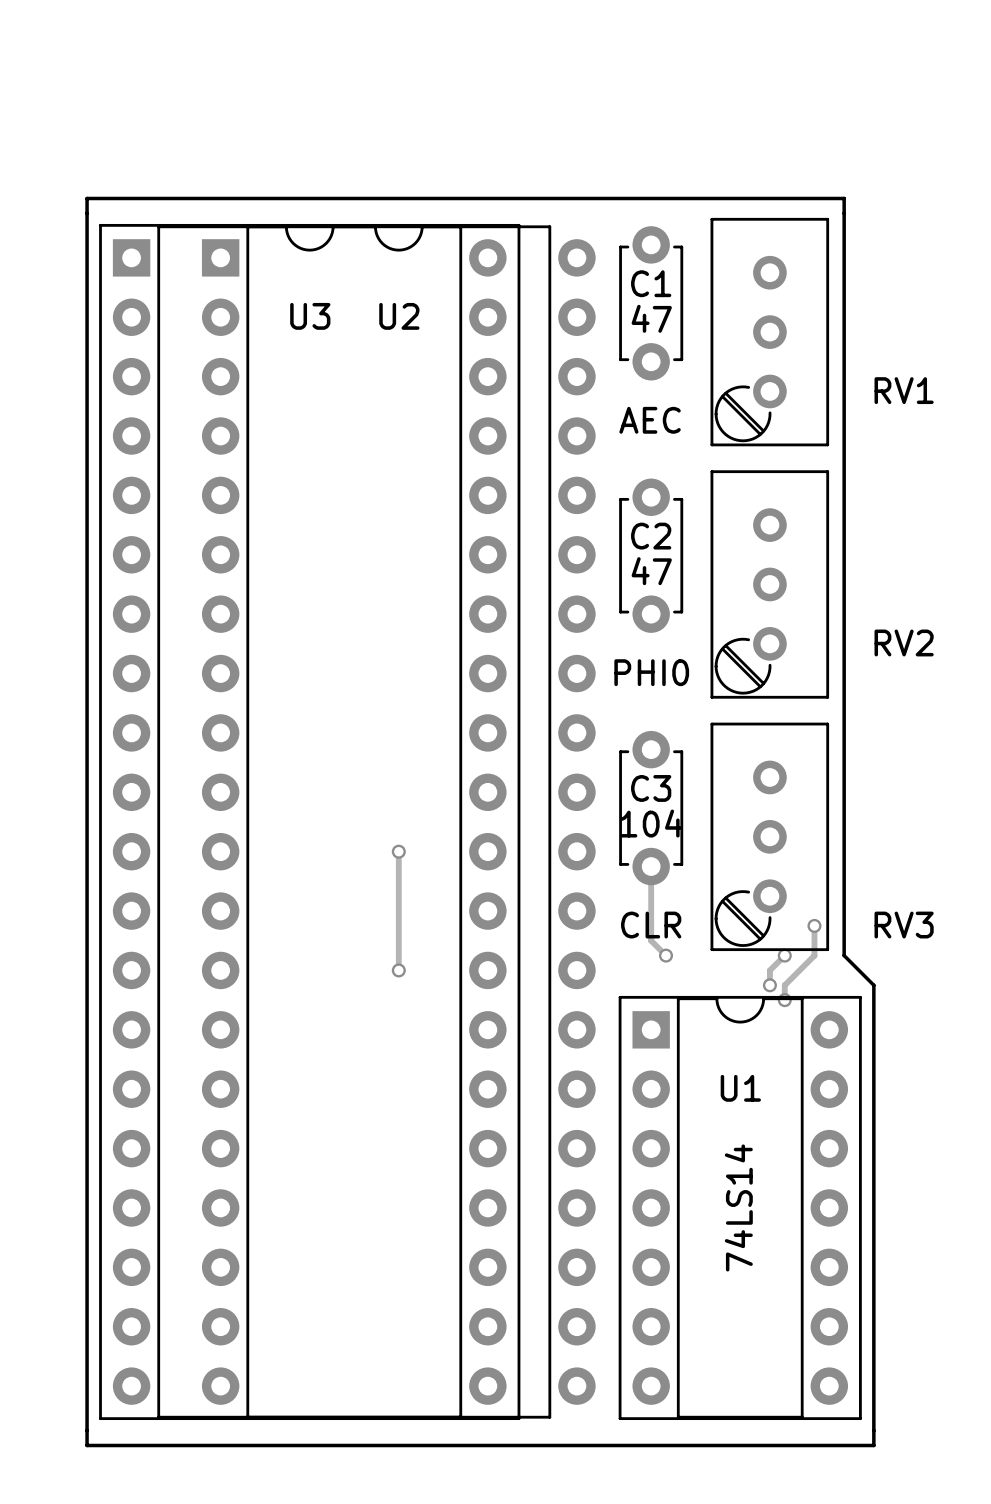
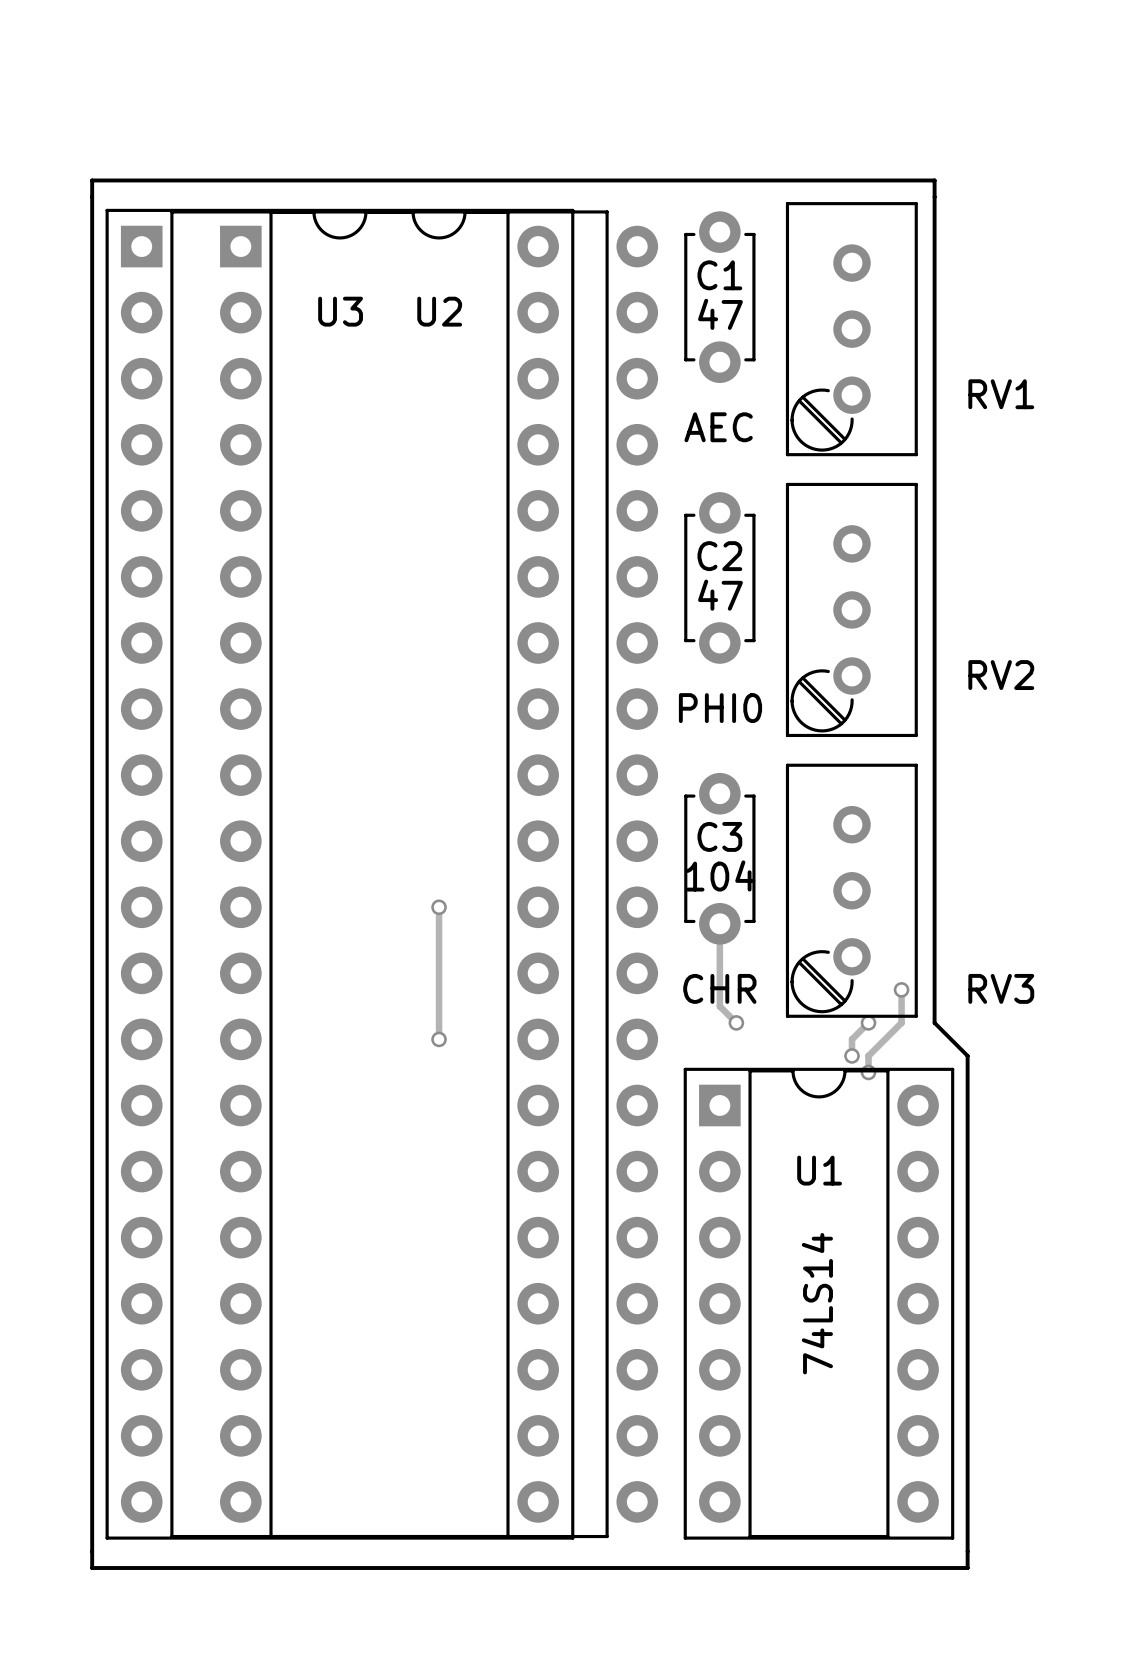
RV3 value: CLR (651, 925) -> CHR (719, 988)

